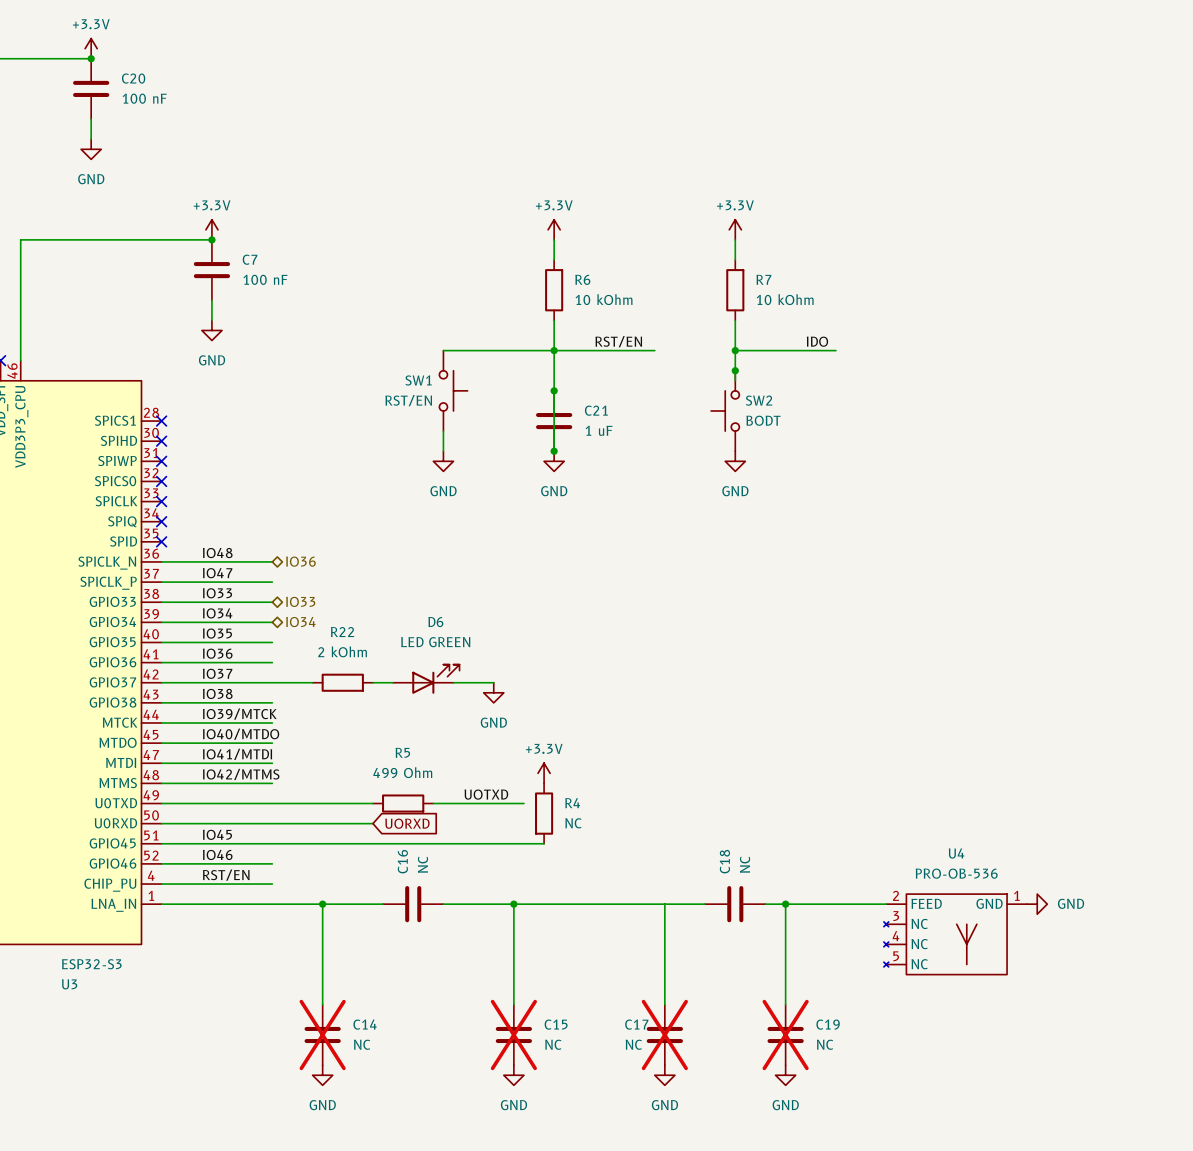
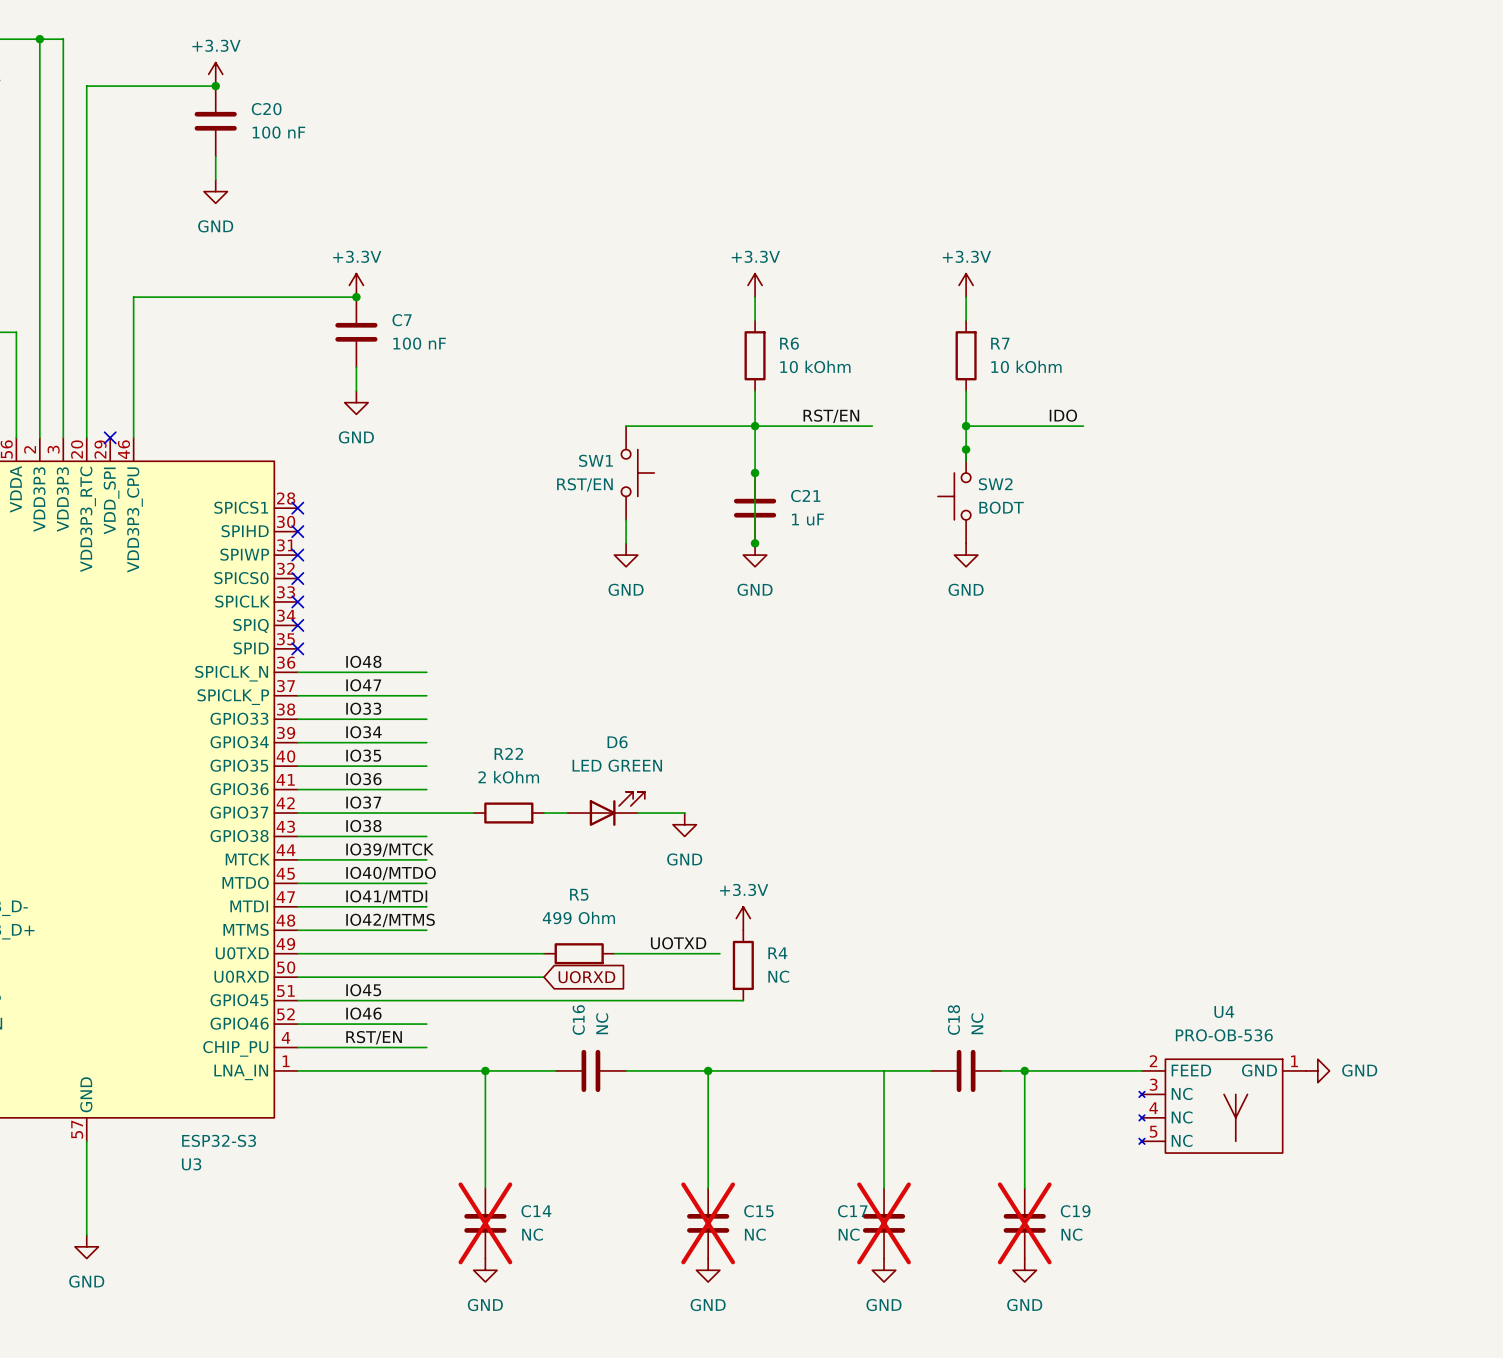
hierarchical label: IO36 (300, 561) -> none
hierarchical label: IO33 (300, 601) -> none
hierarchical label: IO34 (300, 622) -> none

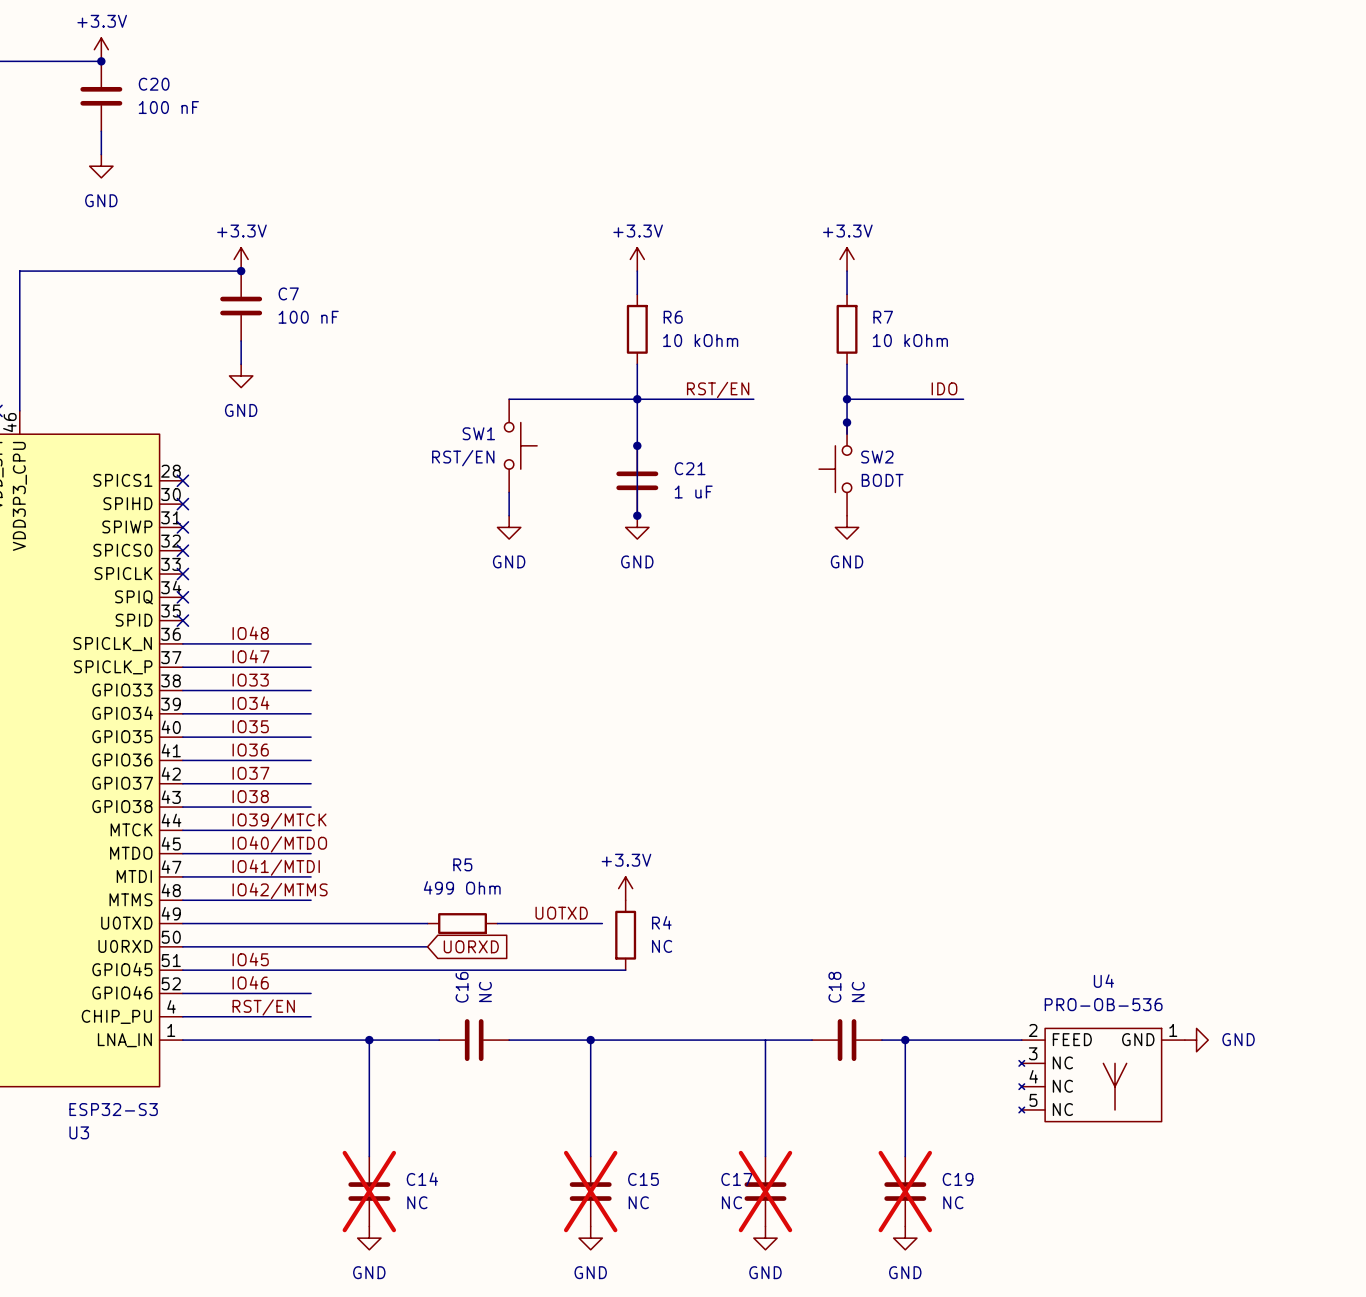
D6: LED GREEN (606, 808) -> none
wire: (426, 813) (473, 813) -> none
R22: 2 kOhm (508, 813) -> none
wire: (544, 813) (567, 813) -> none
wire: (637, 813) (684, 813) -> none
power symbol: GND (684, 824) -> none

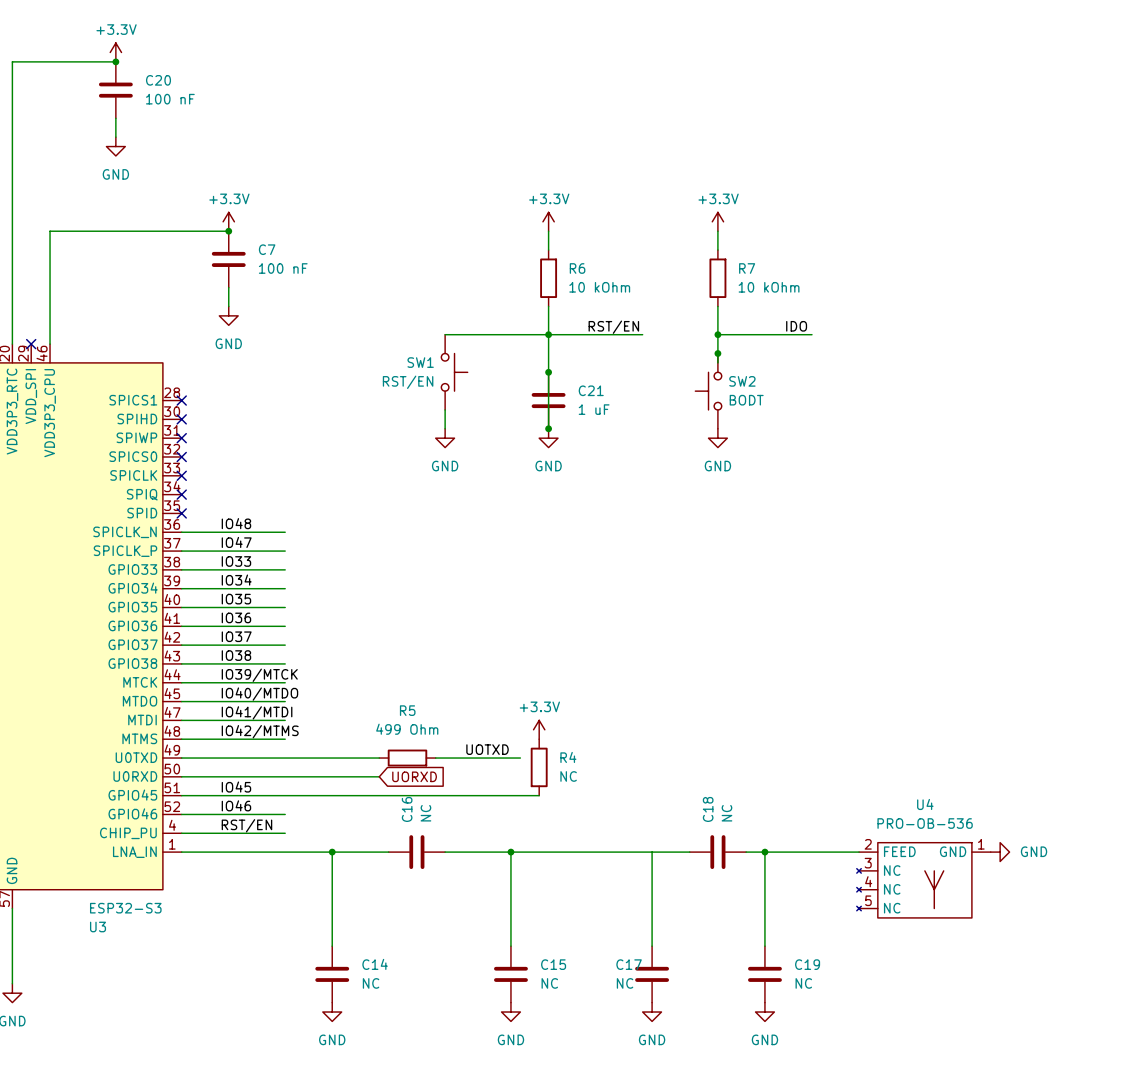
C14 do-not-place cross: (369, 1191) -> none
C15 do-not-place cross: (590, 1191) -> none
C17 do-not-place cross: (765, 1191) -> none
C19 do-not-place cross: (905, 1191) -> none

